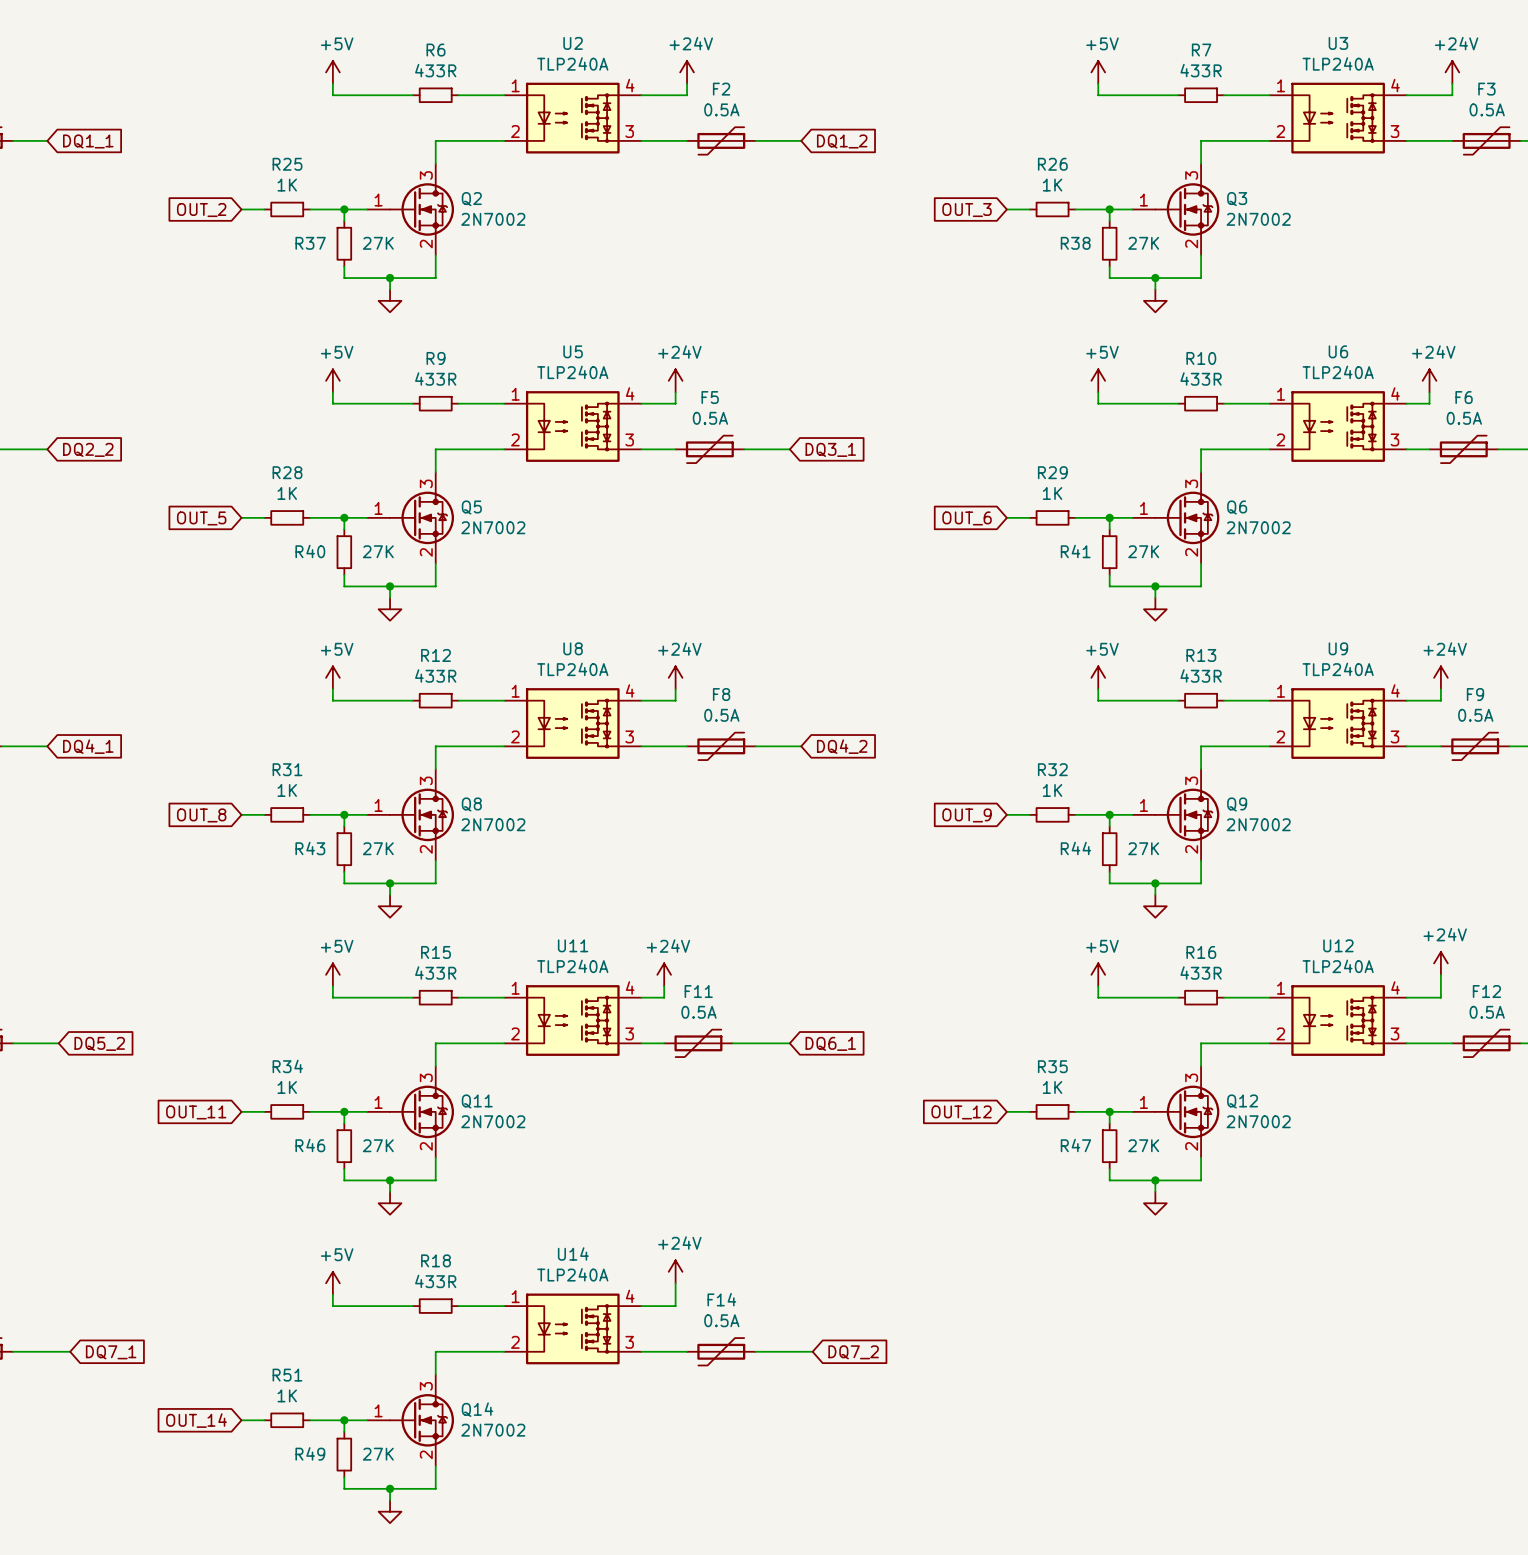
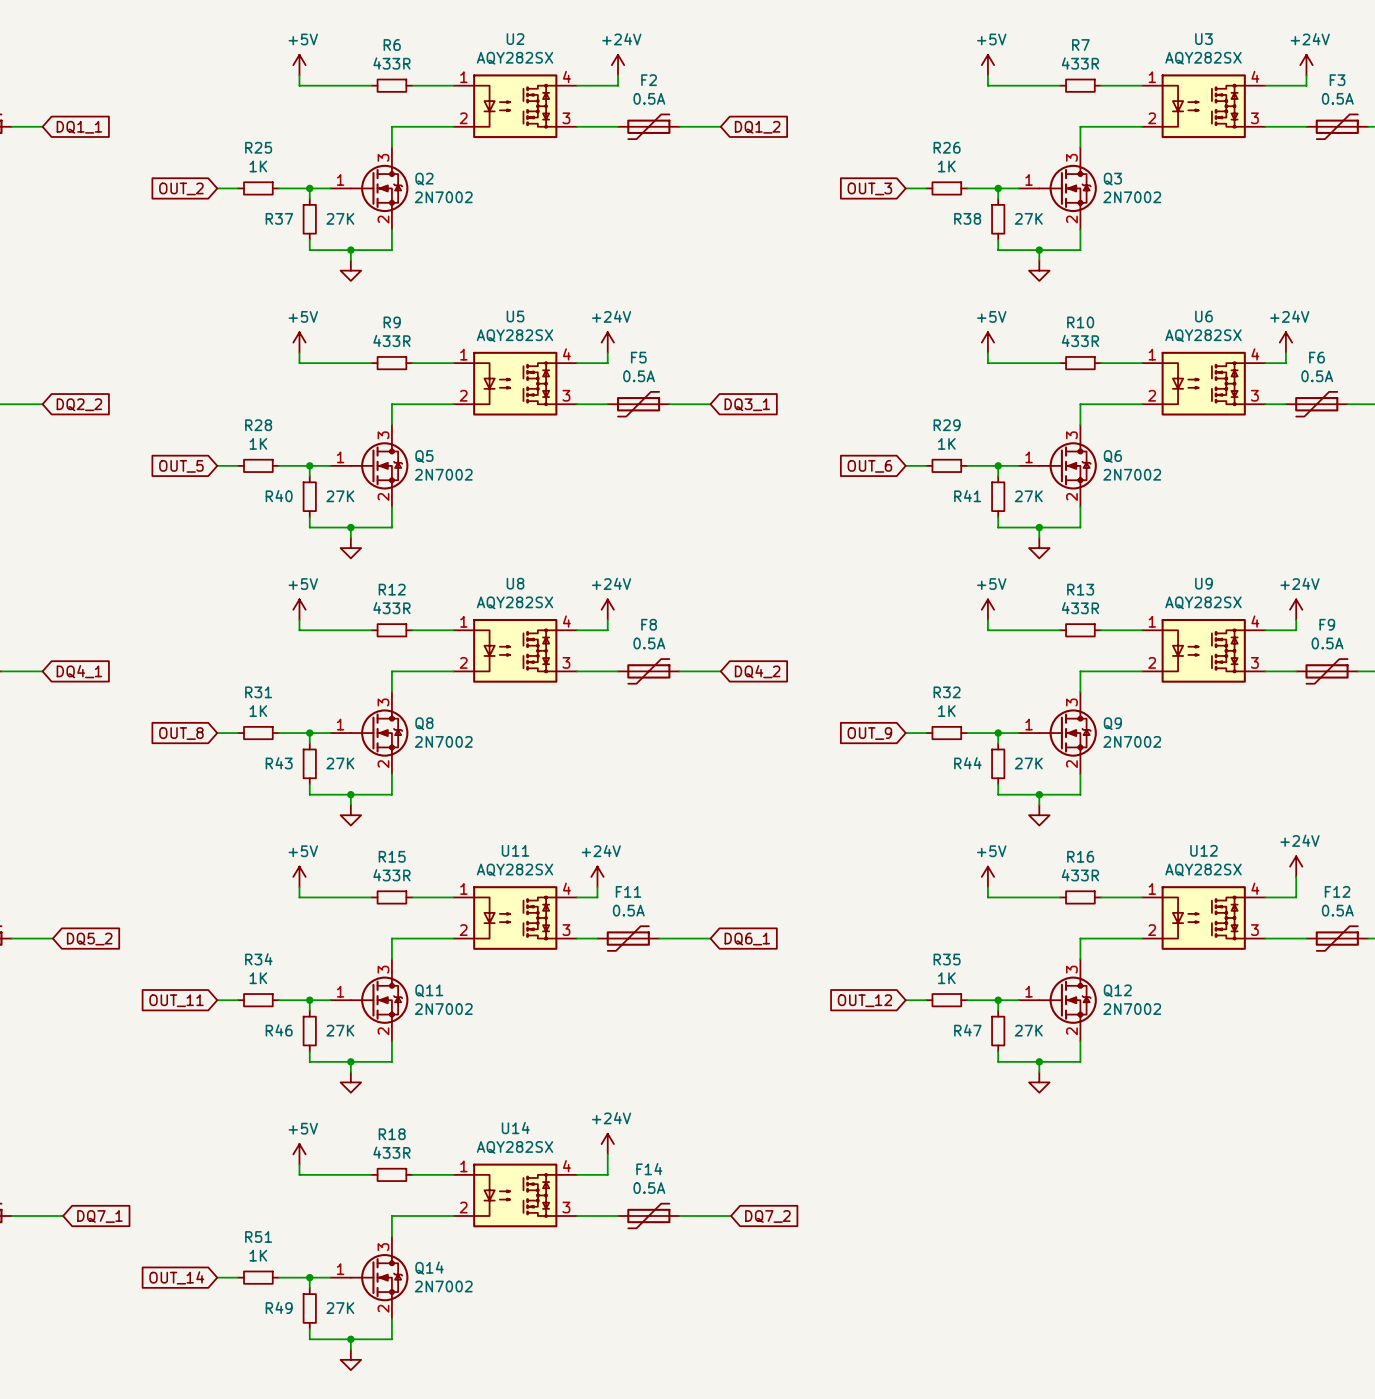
U2 value: TLP240A (572, 63) -> AQY282SX (515, 58)
U3 value: TLP240A (1338, 63) -> AQY282SX (1203, 58)
U5 value: TLP240A (572, 372) -> AQY282SX (515, 335)
U6 value: TLP240A (1338, 372) -> AQY282SX (1203, 335)
U8 value: TLP240A (572, 669) -> AQY282SX (515, 602)
U9 value: TLP240A (1338, 669) -> AQY282SX (1203, 602)
U11 value: TLP240A (572, 966) -> AQY282SX (515, 870)
U12 value: TLP240A (1338, 966) -> AQY282SX (1203, 870)
U14 value: TLP240A (572, 1274) -> AQY282SX (515, 1147)

